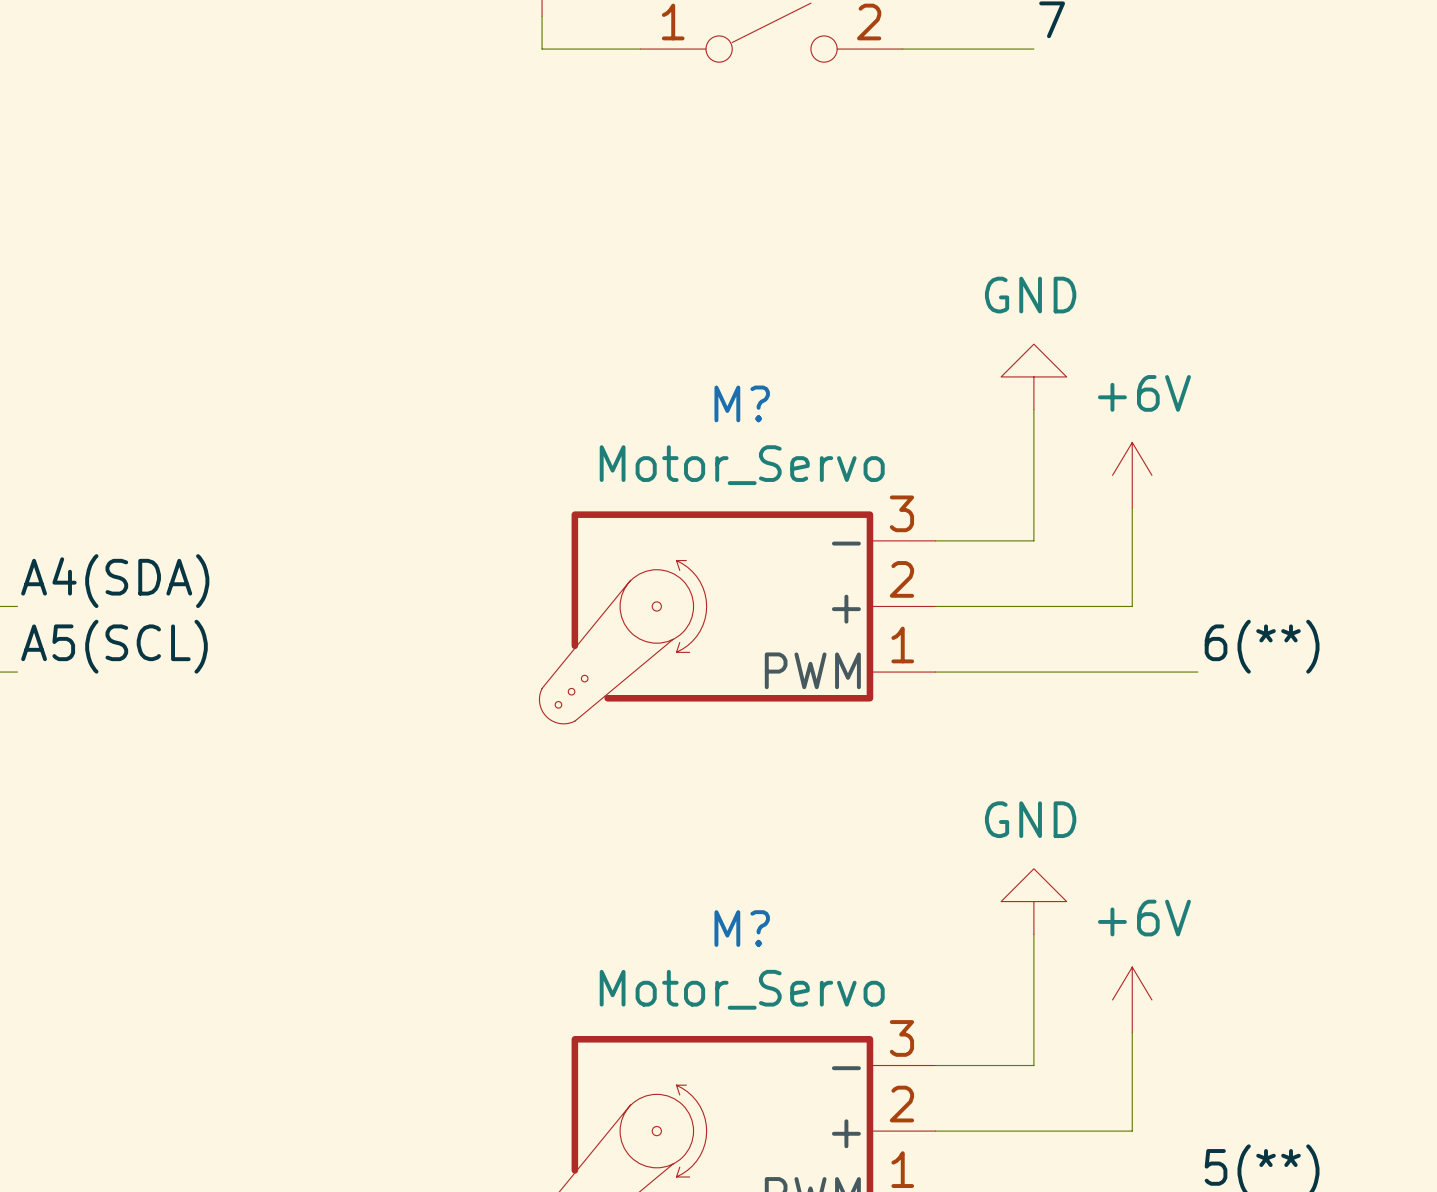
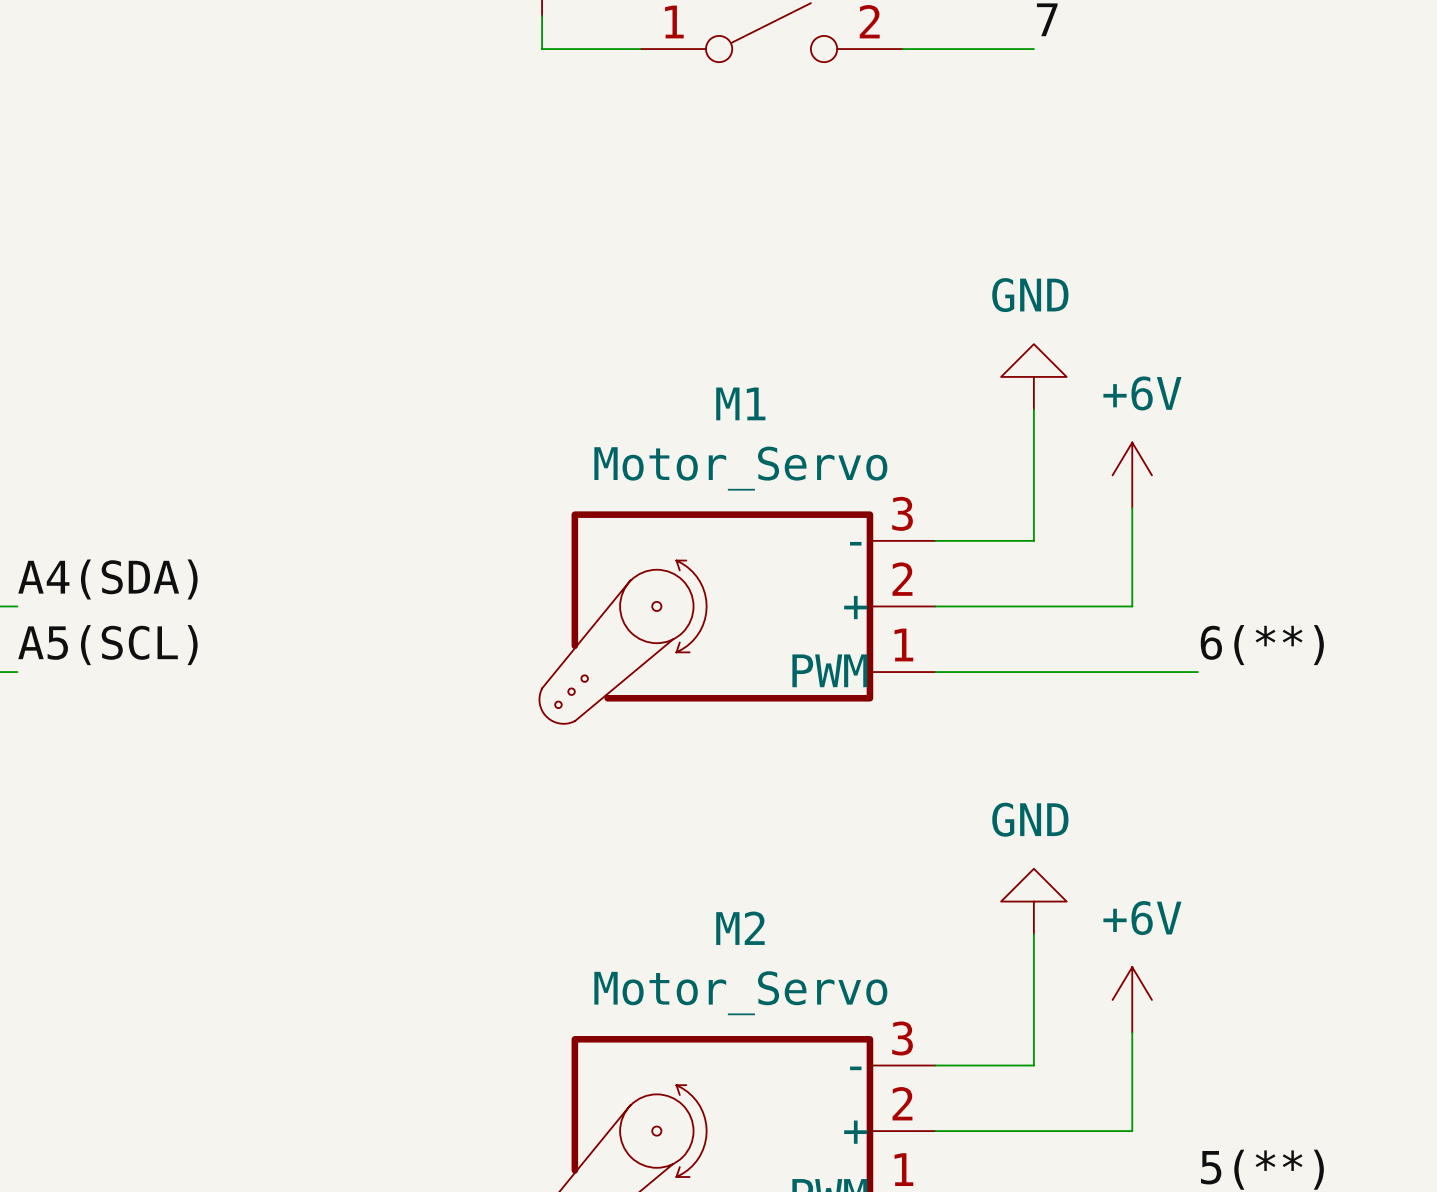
M? name: M? (742, 403) -> M1 (740, 403)
M? name: M? (742, 928) -> M2 (740, 928)

